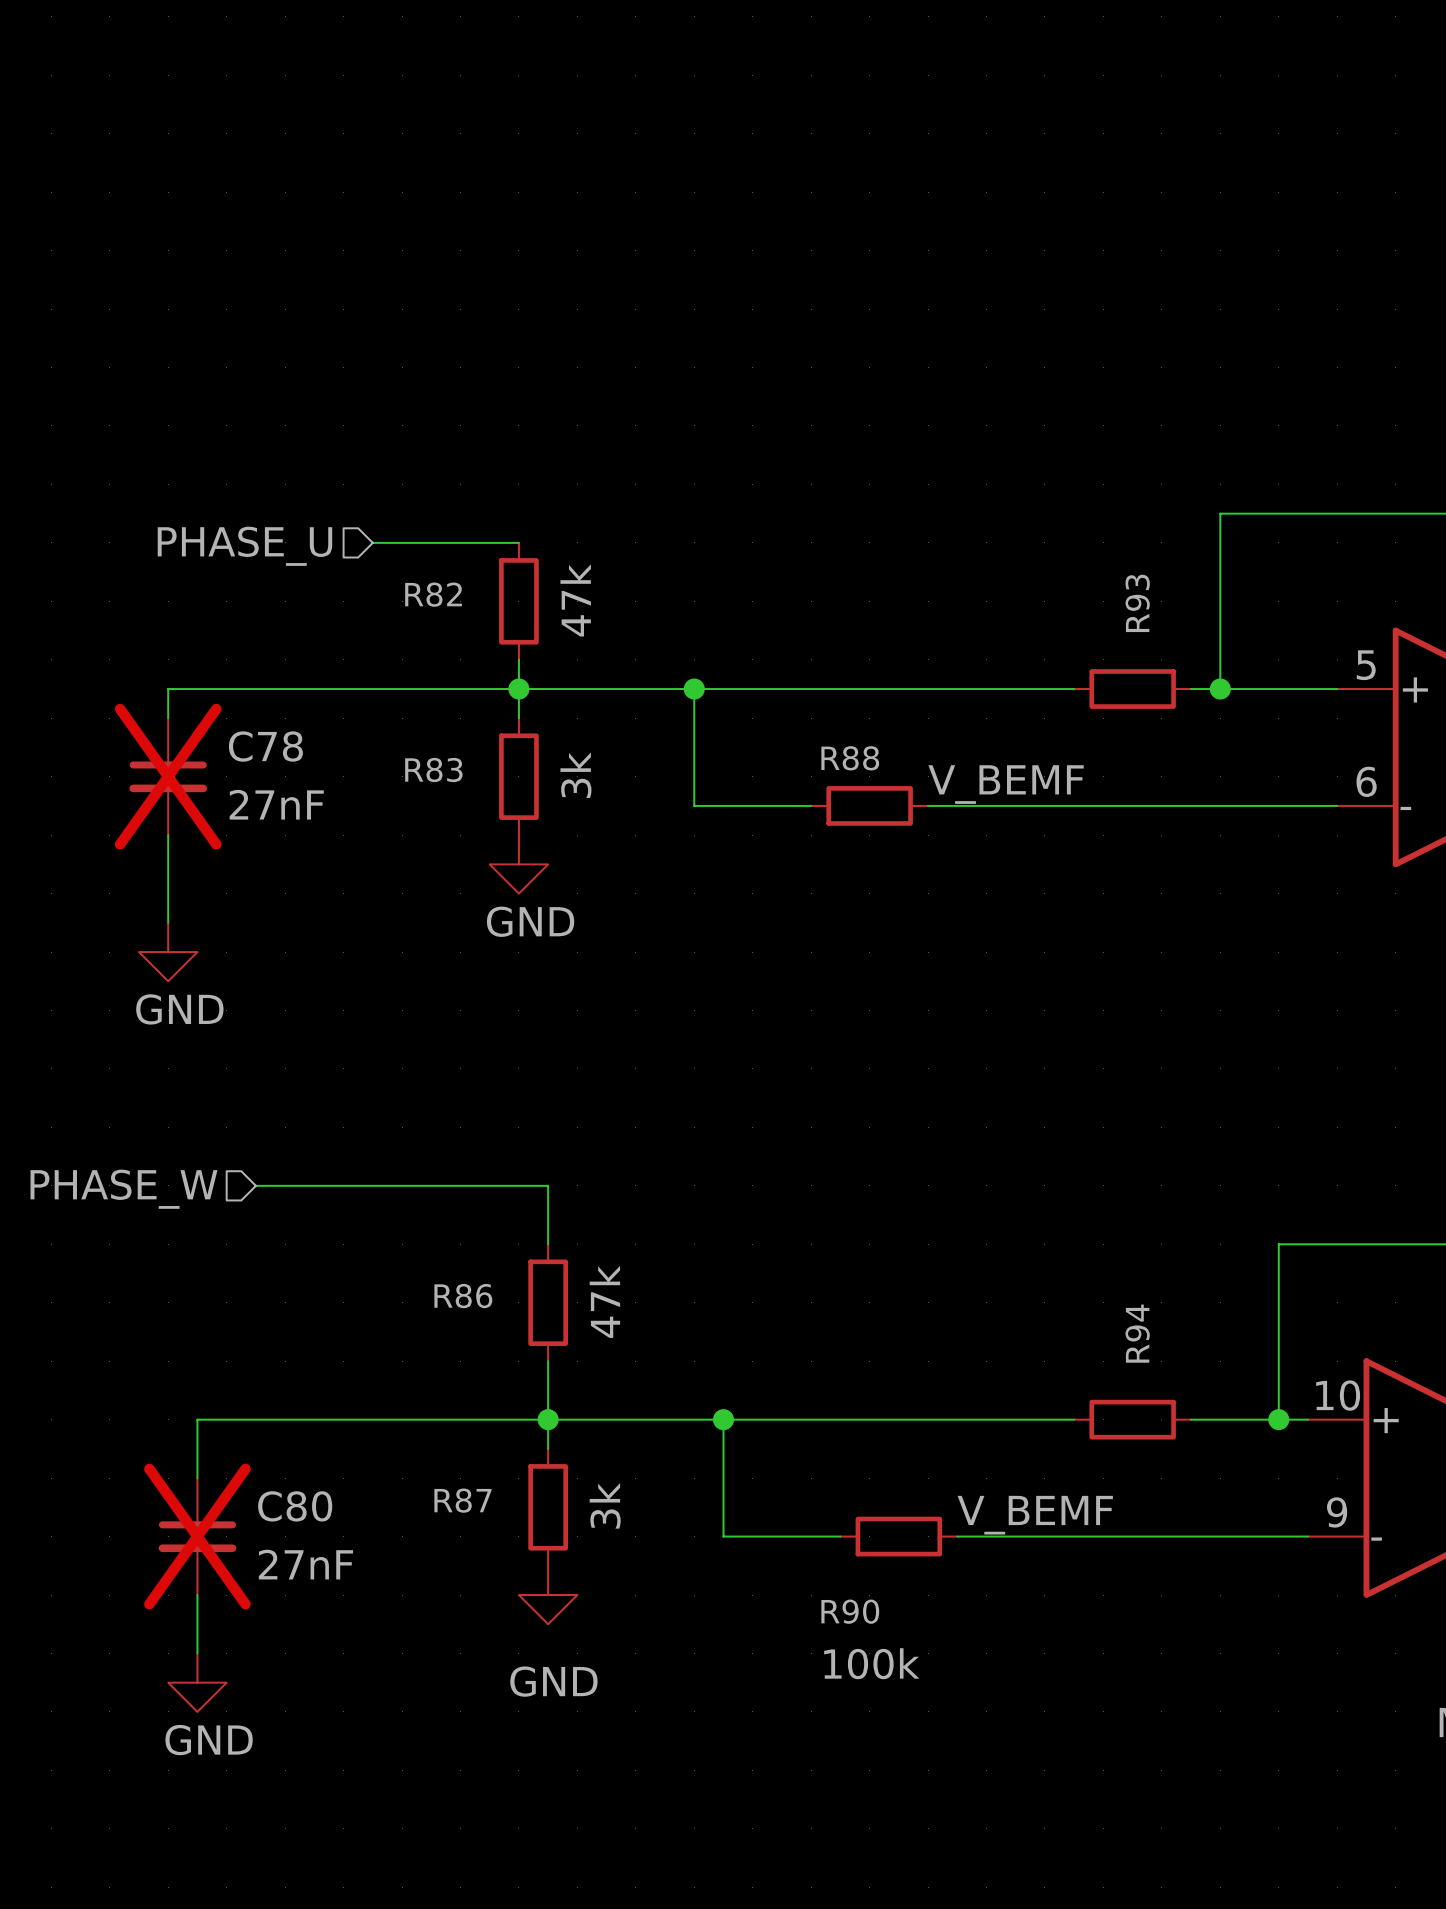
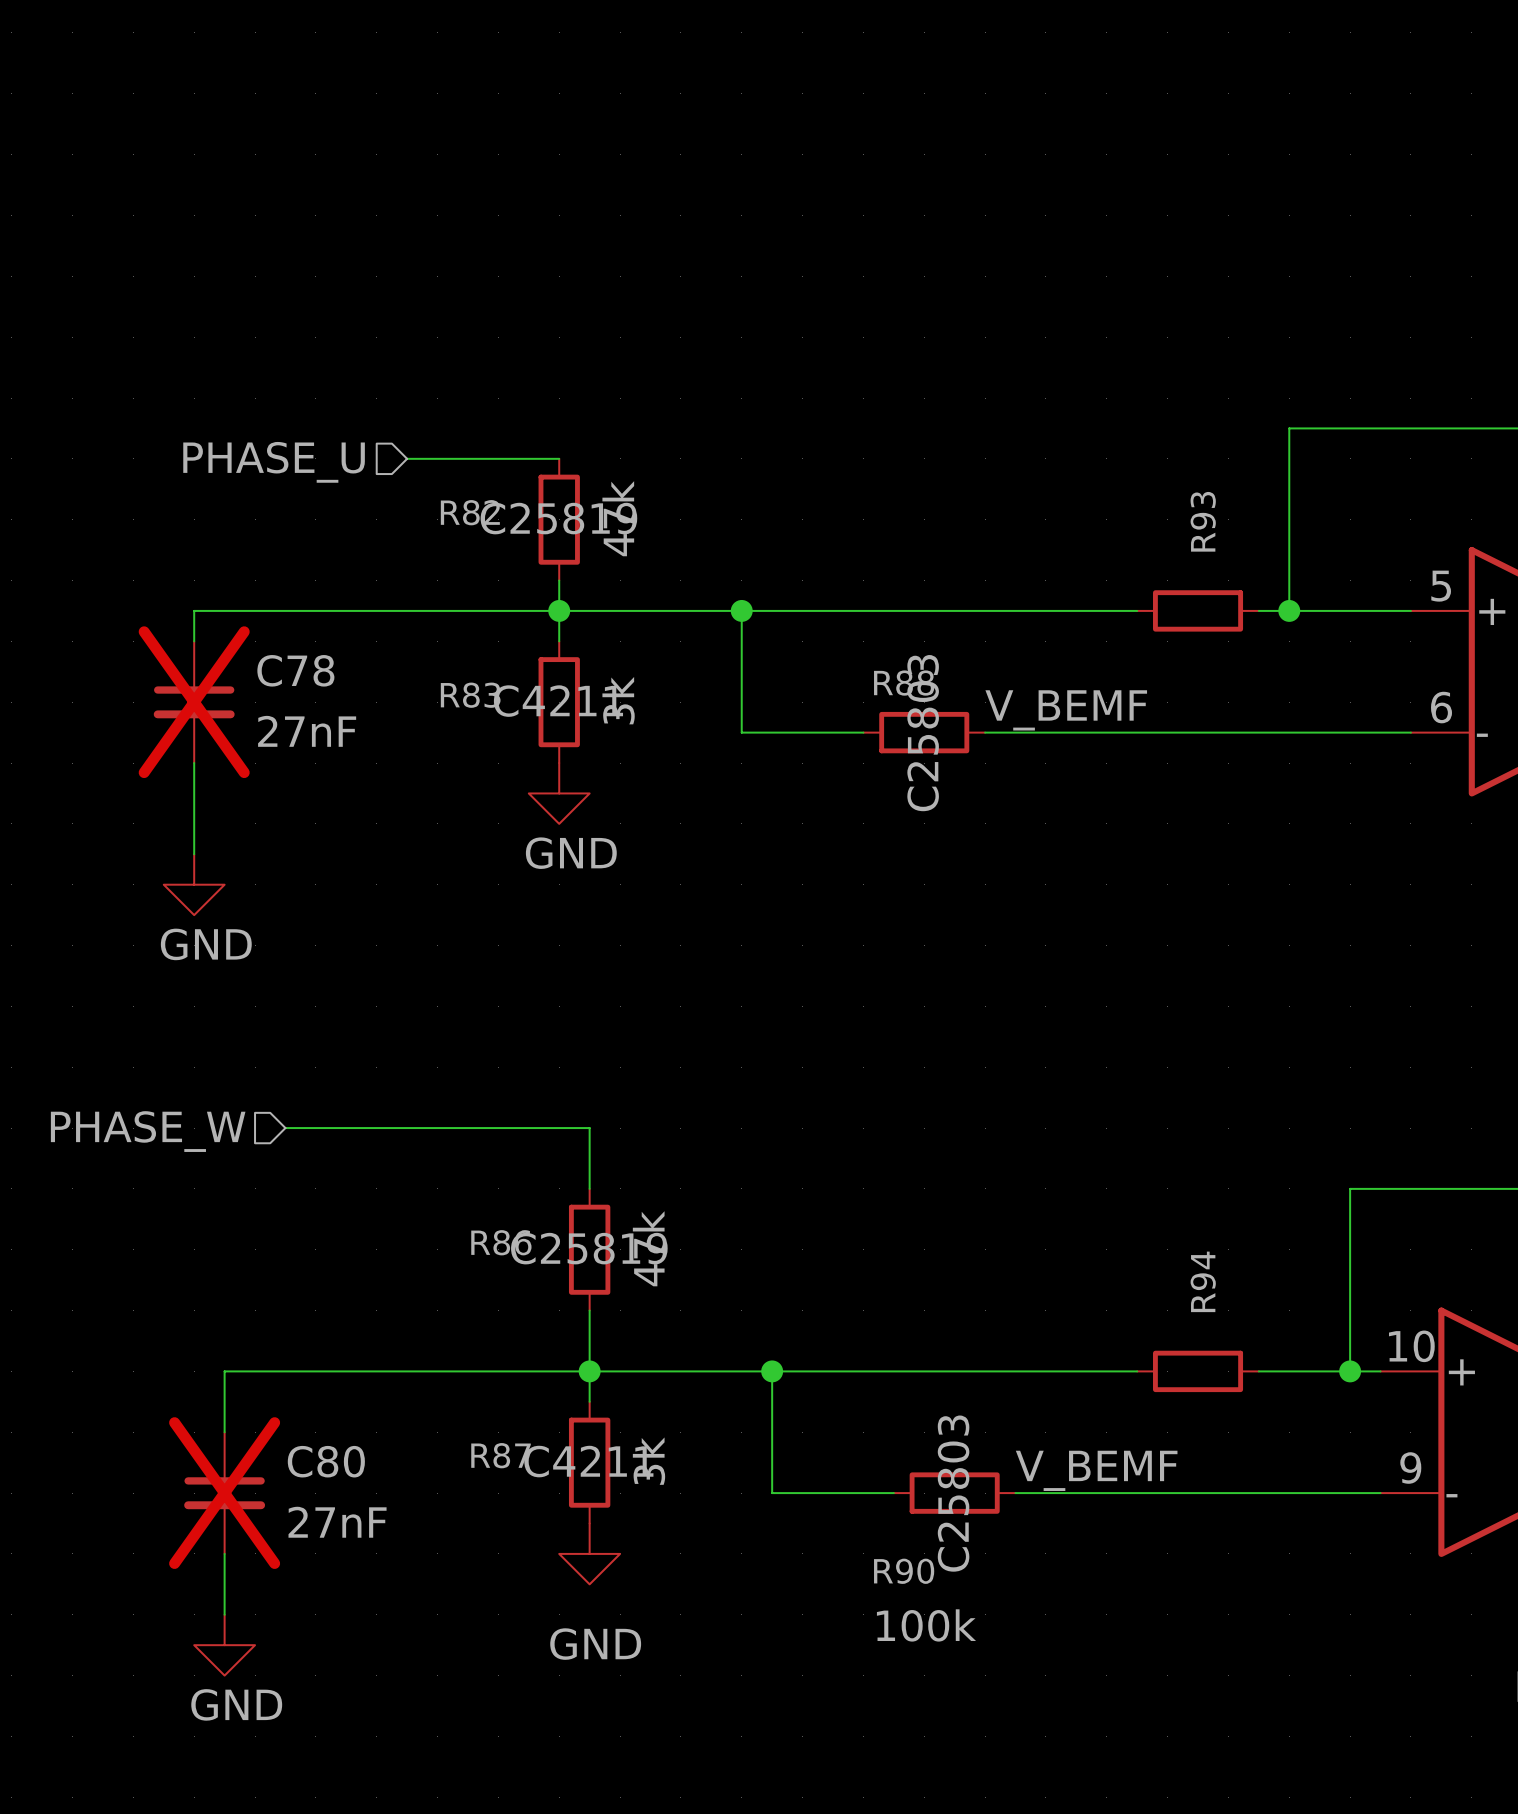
R82 text: none -> C25819 (558, 518)
R83 text: none -> C4211 (558, 701)
R88 text: none -> C25803 (923, 733)
R86 text: none -> C25819 (589, 1248)
R87 text: none -> C4211 (588, 1461)
R90 text: none -> C25803 (953, 1493)

